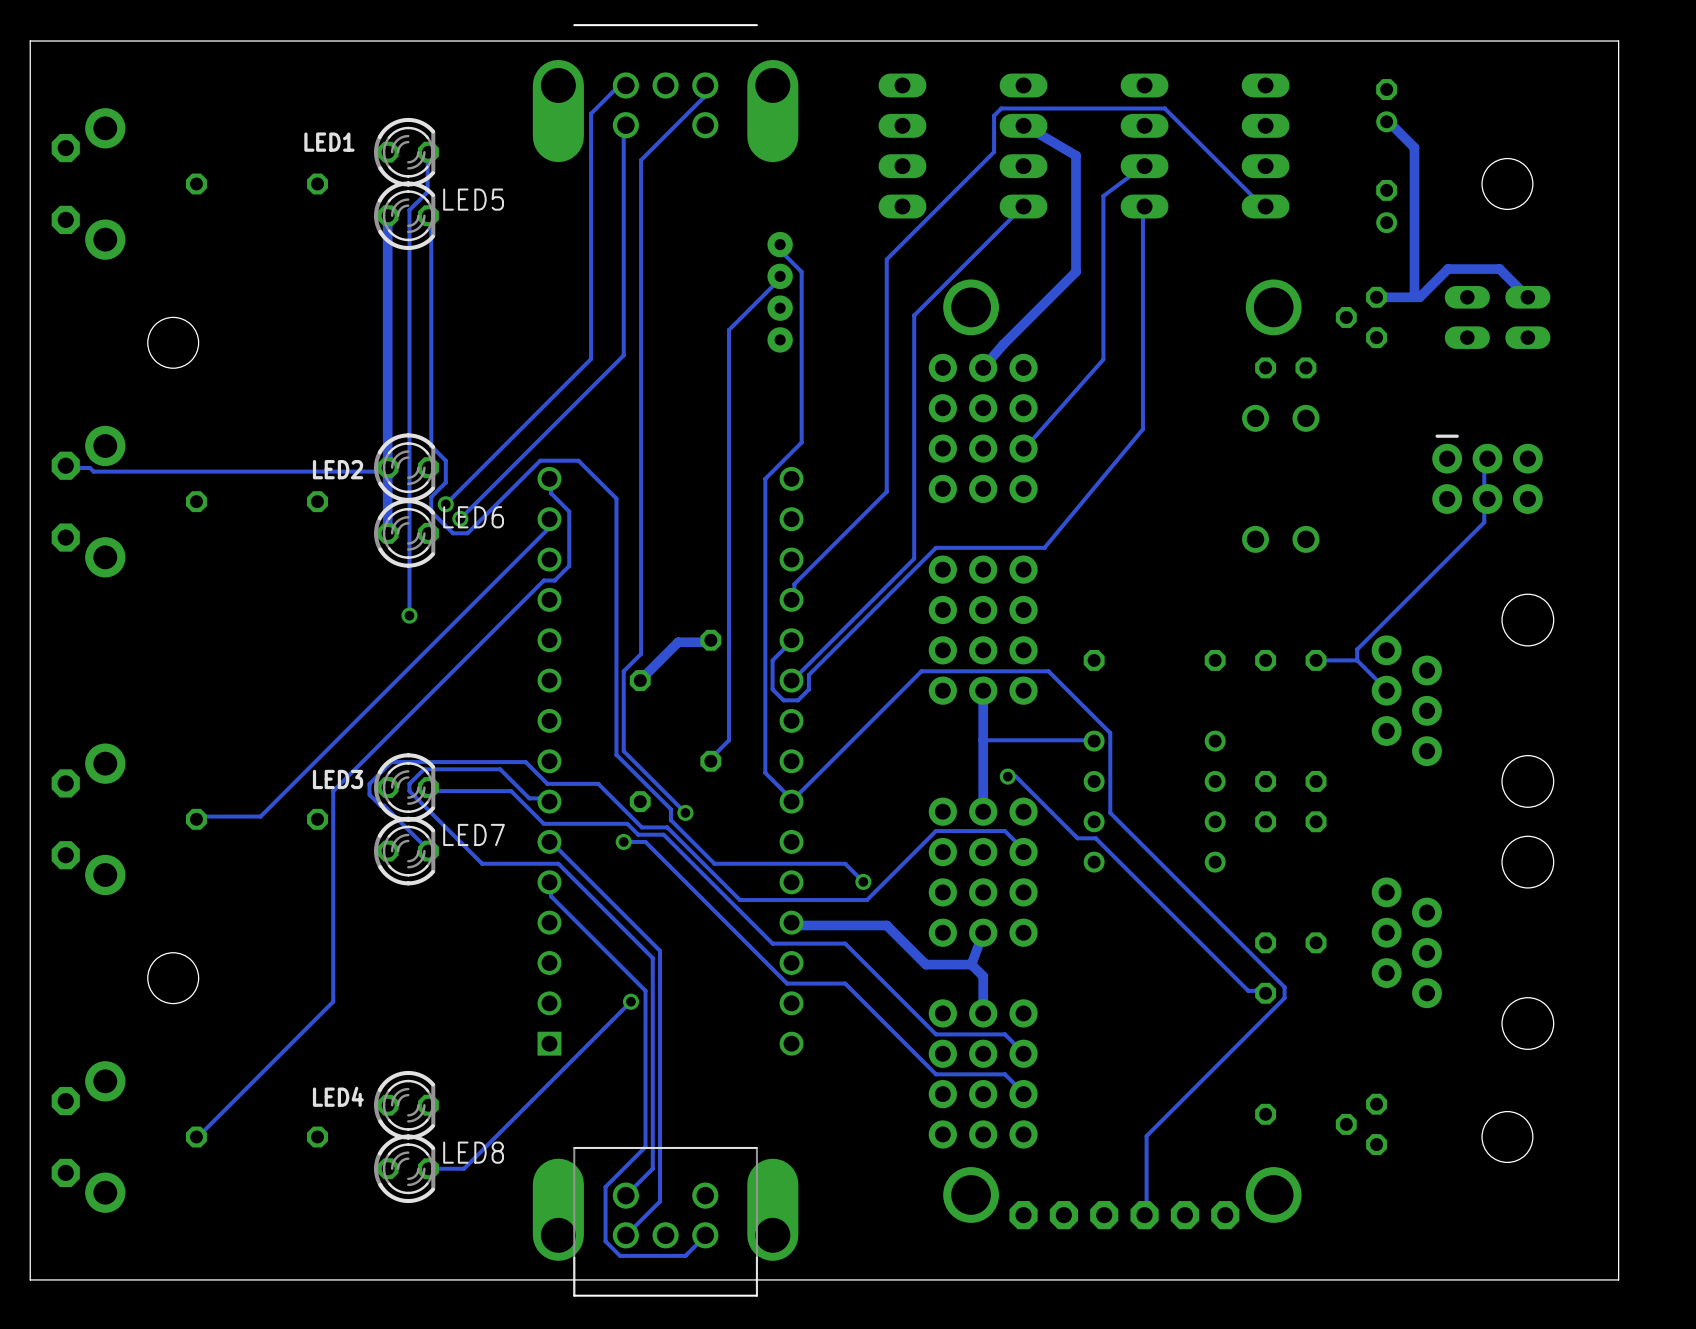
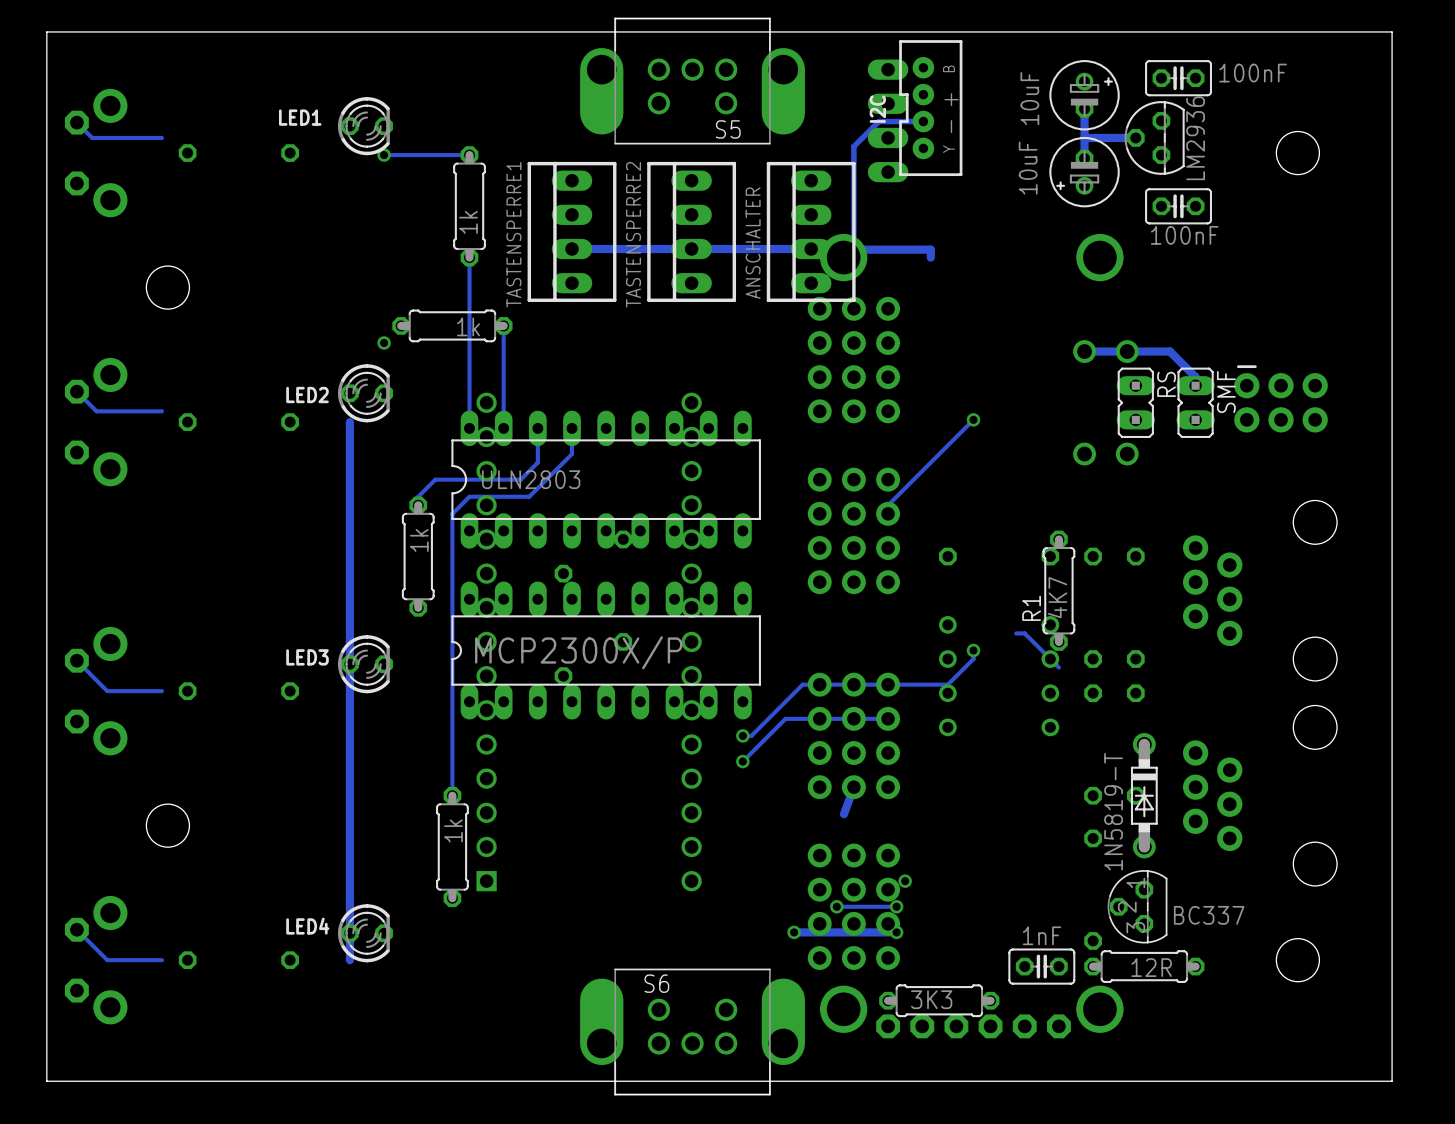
track: (625, 85) (619, 85) (591, 113) (591, 359) (445, 504) -> none
track: (705, 85) (703, 86) (703, 97) (641, 160) (641, 653) (623, 671) (623, 751) (685, 812) -> none
S5 side: top (665, 93) -> bottom (692, 81)
part side: top (1386, 105) -> bottom (1084, 172)
track: (1386, 121) (1414, 147) (1414, 297) -> none
track: (625, 125) (623, 126) (623, 355) (460, 518) -> none
track: (1023, 125) (1075, 155) (1075, 271) (1003, 344) (983, 367) -> none
track: none -> (1084, 108) (1084, 158)
part side: top (902, 146) -> bottom (811, 231)
track: none -> (923, 121) (878, 121) (853, 146) (853, 249)
part side: top (1144, 146) -> bottom (691, 231)
part: (1265, 146) -> none
track: none -> (76, 122) (92, 137) (161, 137)
track: (428, 152) (427, 192) (409, 210) (409, 615) -> none
track: (1144, 166) (1103, 196) (1103, 359) (1023, 448) -> none
track: none -> (1135, 137) (1084, 137)
via: none -> (384, 155)
track: none -> (469, 155) (384, 155)
track: (1023, 206) (914, 315) (914, 558) (791, 680) -> none
track: (1144, 206) (1142, 206) (1142, 429) (1044, 547) (935, 547) (808, 674) (808, 689) (798, 700) (783, 700) (772, 689) (772, 660) (791, 640) -> none
track: (1265, 206) (1262, 206) (1164, 108) (1001, 108) (994, 115) (994, 152) (886, 259) (886, 491) (794, 584) (794, 598) (791, 599) -> none
part side: top (1386, 206) -> bottom (1084, 95)
track: (388, 215) (388, 467) -> none
LED5: (406, 215) -> none
track: (428, 215) (431, 217) (431, 446) (445, 460) (445, 482) (431, 497) (431, 511) (453, 533) (467, 533) (540, 460) (578, 460) (616, 498) (616, 754) (670, 809) (670, 820) (714, 863) (845, 863) (863, 881) -> none
track: (780, 244) (783, 246) (783, 253) (801, 271) (801, 442) (765, 478) (765, 772) (790, 798) (791, 801) (921, 671) (1048, 671) (1110, 733) (1110, 812) (1284, 987) (1284, 998) (1146, 1136) (1146, 1212) (1144, 1215) -> none
part: none -> 1k (469, 206)
part: none -> 100nF (1178, 206)
track: (780, 276) (779, 279) (729, 329) (729, 740) (710, 758) (710, 761) -> none
part: none -> TASTENSPERRE1 (572, 231)
I2C side: top (780, 292) -> bottom (930, 108)
track: none -> (572, 249) (930, 249) (930, 257)
track: (1527, 297) (1499, 269) (1447, 269) (1419, 297) (1376, 297) -> none
track: none -> (469, 257) (469, 428)
part side: top (1361, 317) -> bottom (1154, 137)
RS side: top (1467, 317) -> bottom (1135, 402)
SMF side: top (1527, 317) -> bottom (1195, 402)
part side: top (1285, 367) -> bottom (1178, 78)
part: none -> 1k (452, 325)
track: none -> (503, 325) (503, 428)
via: none -> (384, 342)
track: none -> (1093, 351) (1169, 351) (1195, 377) (1195, 385)
track: (1487, 458) (1484, 460) (1484, 497) (1487, 499) (1484, 500) (1484, 522) (1357, 649) (1357, 660) -> none
track: (65, 465) (68, 467) (89, 467) (93, 471) (387, 471) -> (76, 391) (96, 411) (161, 411)
track: (387, 471) (388, 533) -> none
track: (549, 478) (551, 478) (551, 493) (569, 511) (569, 566) (554, 580) (543, 580) (333, 791) (333, 1001) (196, 1137) -> none
track: none -> (973, 419) (888, 505)
via: none -> (973, 419)
track: none -> (349, 422) (349, 960)
via: (445, 504) -> none
track: none -> (537, 428) (537, 462) (520, 479) (435, 479) (418, 496) (418, 505)
track: none -> (572, 428) (572, 454) (529, 496) (469, 496) (452, 513) (452, 795)
via: (460, 518) -> none
track: (549, 519) (547, 529) (260, 816) (198, 816) (196, 819) -> none
LED6: (406, 533) -> none
part: none -> ULN2803 (606, 479)
via: (409, 615) -> none
track: (710, 640) (710, 642) (678, 642) (640, 680) -> none
part: none -> 1k (418, 556)
track: (1357, 660) (1316, 660) -> none
track: (1357, 660) (1386, 690) -> none
track: (983, 690) (983, 811) -> none
R1: none -> 4K7 (1058, 590)
track: (983, 740) (1094, 741) -> none
track: none -> (1016, 633) (1024, 633) (1058, 667)
part: none -> MCP2300X/P (606, 650)
track: none -> (973, 650) (973, 659) (947, 684) (802, 684) (751, 735) (742, 735)
via: none -> (973, 650)
track: (1007, 776) (1015, 776) (1077, 838) (1095, 838) (1248, 990) (1262, 990) (1265, 993) -> none
via: (1007, 776) -> none
track: none -> (76, 660) (107, 691) (161, 691)
track: (428, 787) (431, 791) (511, 791) (543, 823) (627, 823) (638, 834) (663, 834) (772, 943) (845, 943) (935, 1034) (1004, 1034) (1023, 1053) -> none
track: (549, 801) (547, 798) (529, 798) (500, 769) (424, 769) (409, 783) (409, 791) (482, 863) (558, 863) (652, 958) (652, 1168) (625, 1195) -> none
via: (685, 812) -> none
track: (549, 841) (660, 950) (660, 1201) (625, 1235) -> none
track: (623, 841) (645, 841) (787, 983) (845, 983) (935, 1074) (1004, 1074) (1023, 1094) -> none
via: (623, 841) -> none
LED7: (406, 851) -> none
track: (428, 851) (384, 805) (380, 805) (369, 794) (369, 783) (391, 762) (525, 762) (547, 783) (598, 783) (641, 827) (667, 827) (739, 900) (867, 900) (935, 831) (1004, 831) (1023, 849) (1023, 852) -> none
track: none -> (896, 718) (785, 718) (742, 761)
via position: (863, 881) -> (742, 735)
track: (549, 882) (551, 896) (645, 990) (645, 1146) (605, 1186) (605, 1241) (620, 1255) (685, 1255) (705, 1235) -> none
via: none -> (742, 761)
track: (791, 922) (794, 925) (886, 925) (925, 964) (971, 964) (983, 976) (983, 1013) -> none
part: none -> 1N5819-T (1144, 795)
track: (630, 1001) (463, 1168) (428, 1168) -> none
via: (630, 1001) -> none
part: none -> 1k (452, 846)
via: none -> (905, 881)
via: none -> (836, 906)
track: none -> (896, 906) (836, 906)
via: none -> (896, 906)
track: none -> (76, 929) (107, 960) (161, 960)
via: none -> (794, 932)
track: none -> (896, 932) (794, 932)
via: none -> (896, 932)
part side: top (1361, 1124) -> bottom (1137, 906)
part: none -> 1nF (1041, 966)
part: none -> 12R (1144, 966)
LED8: (406, 1168) -> none
part: none -> 3K3 (939, 1000)
part: (665, 1221) -> none
S6: none -> (692, 1032)

